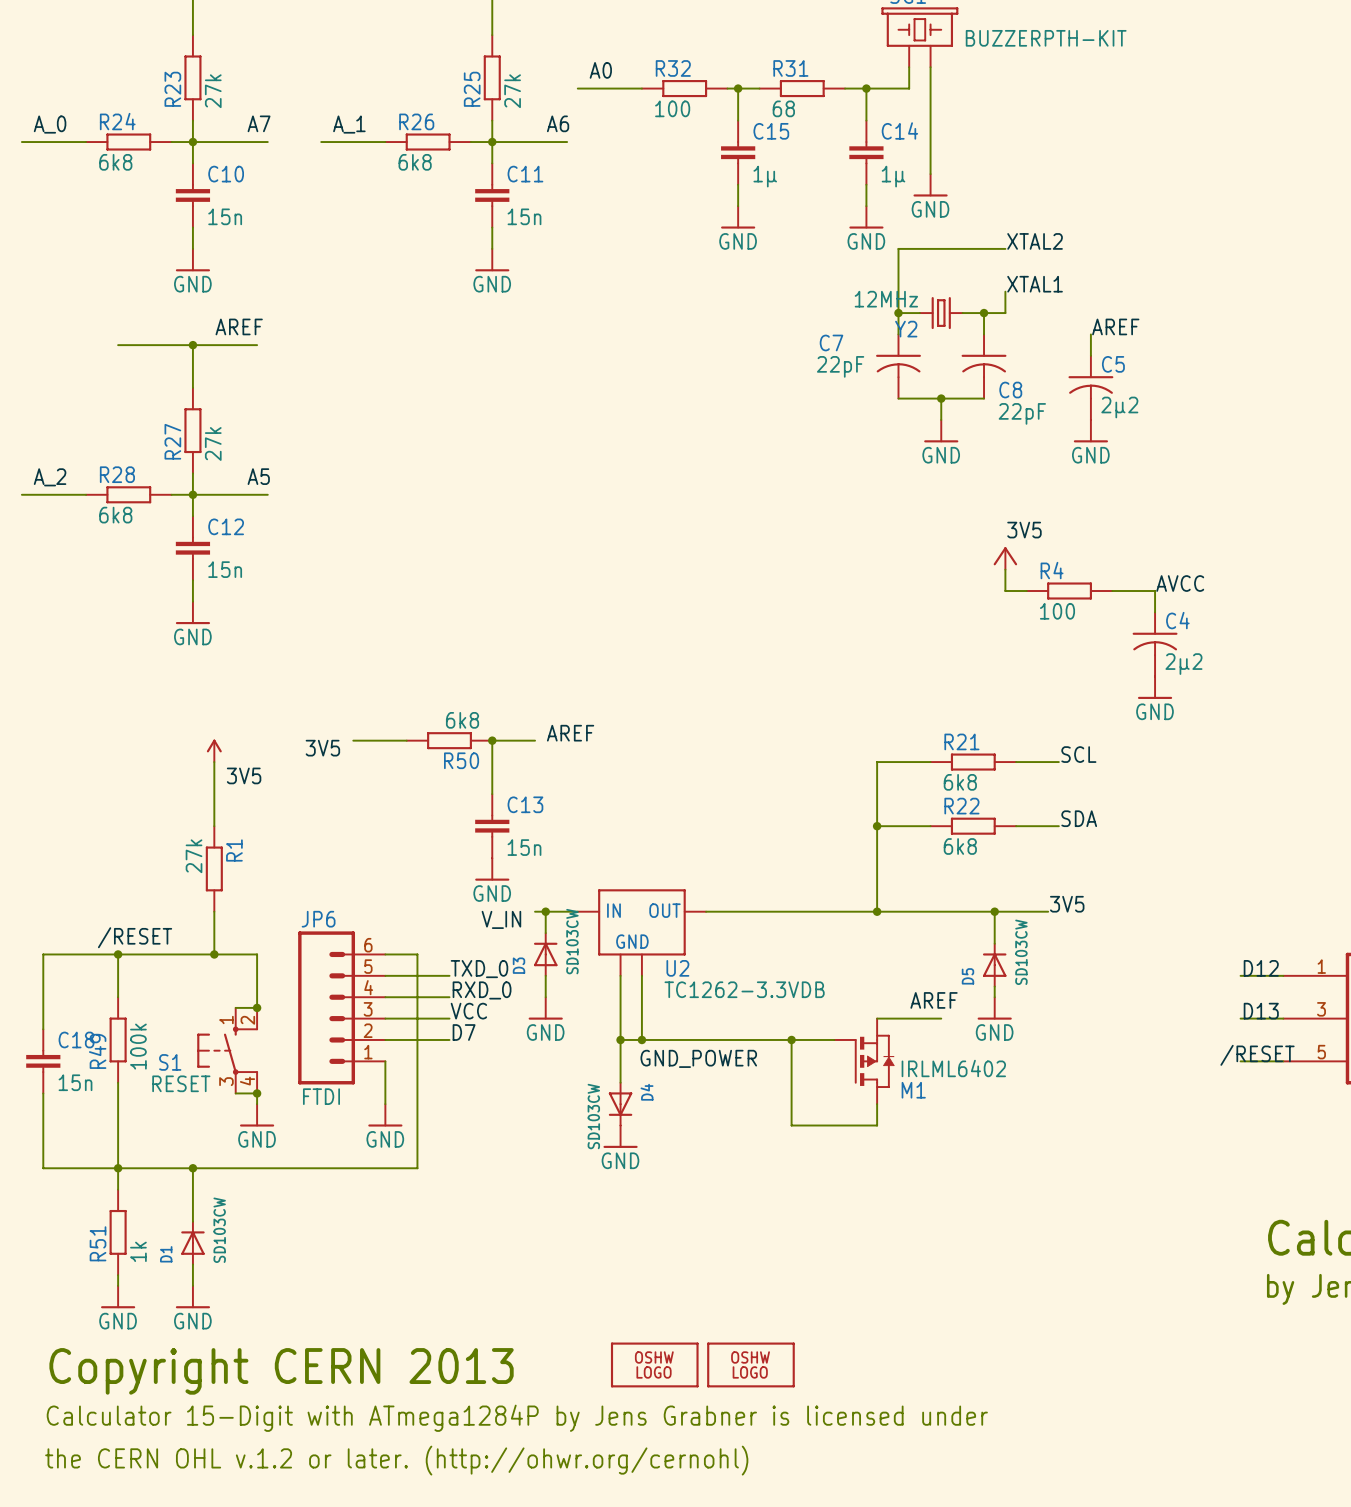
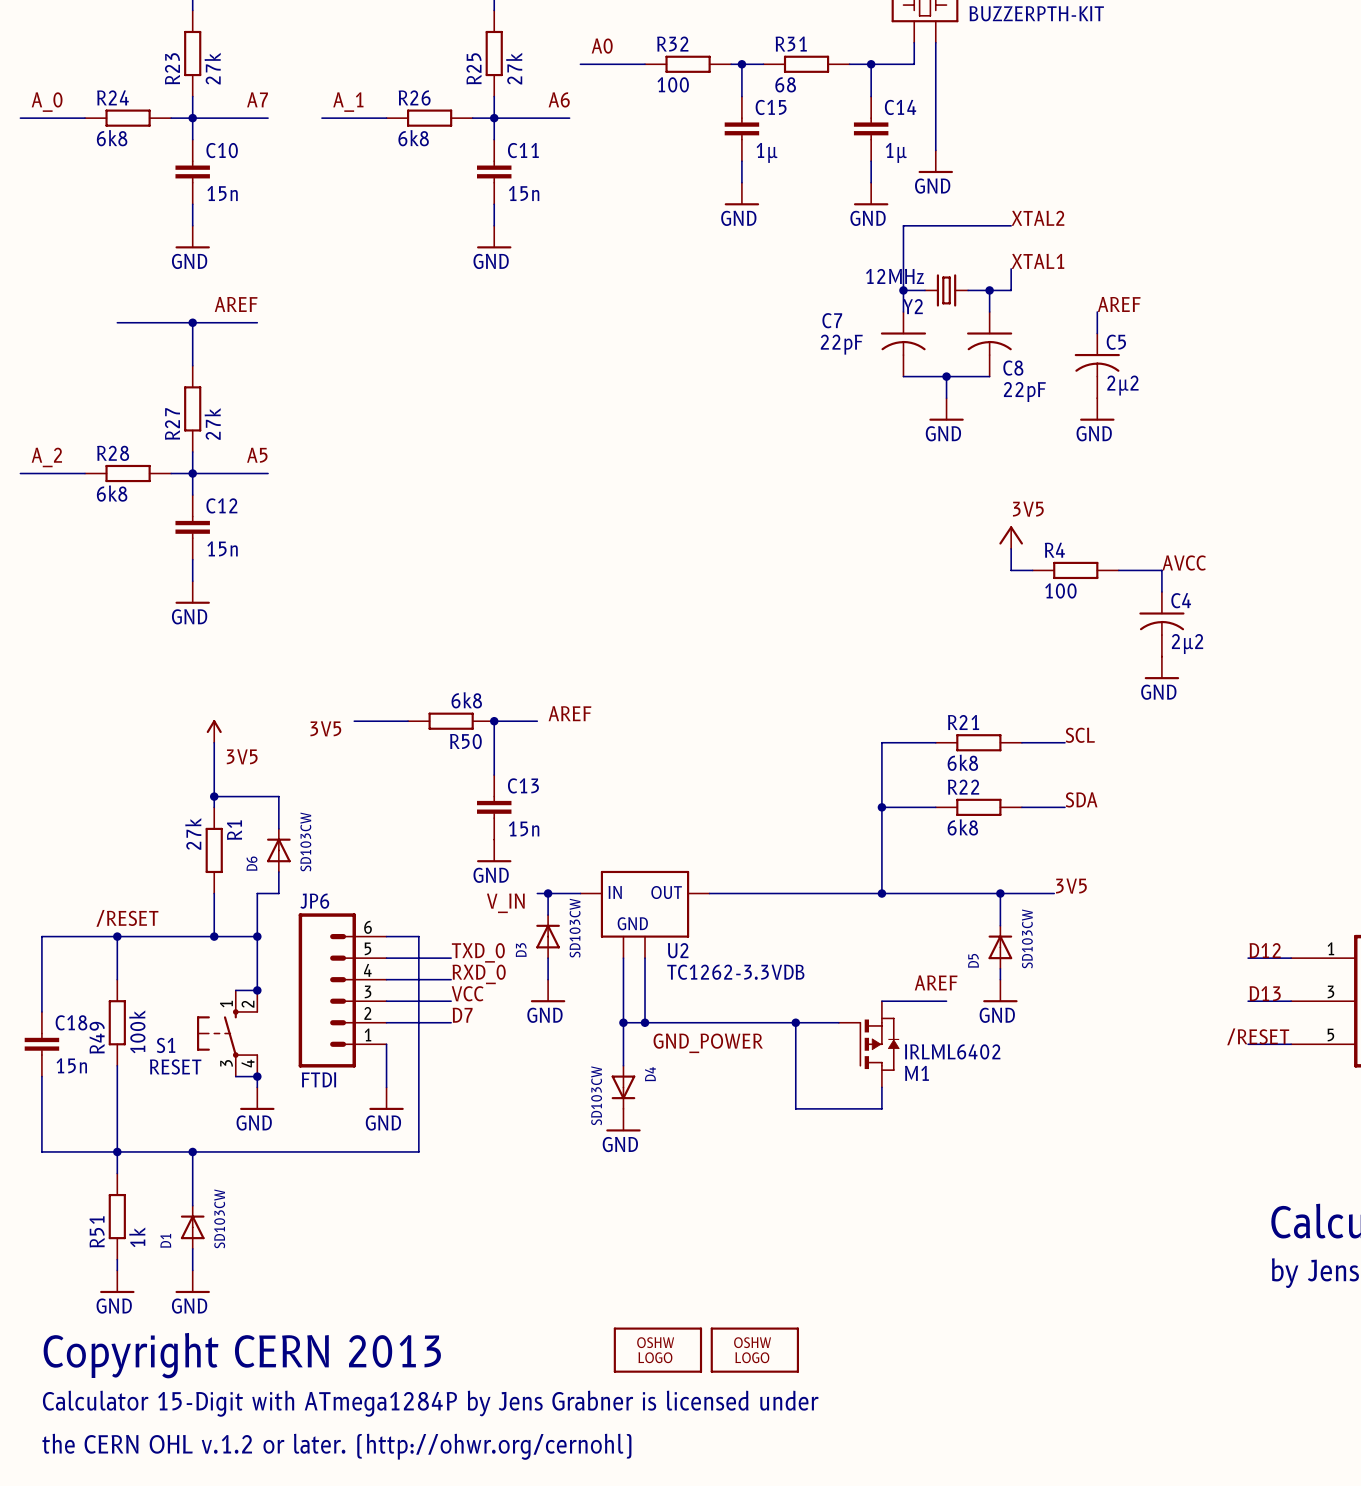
wire: none -> (214, 796) (278, 796) (278, 828)
junction: none -> (214, 796)
D6: none -> SD103CW (278, 850)
wire: none -> (278, 871) (278, 893) (257, 893) (257, 936)
junction: none -> (257, 936)

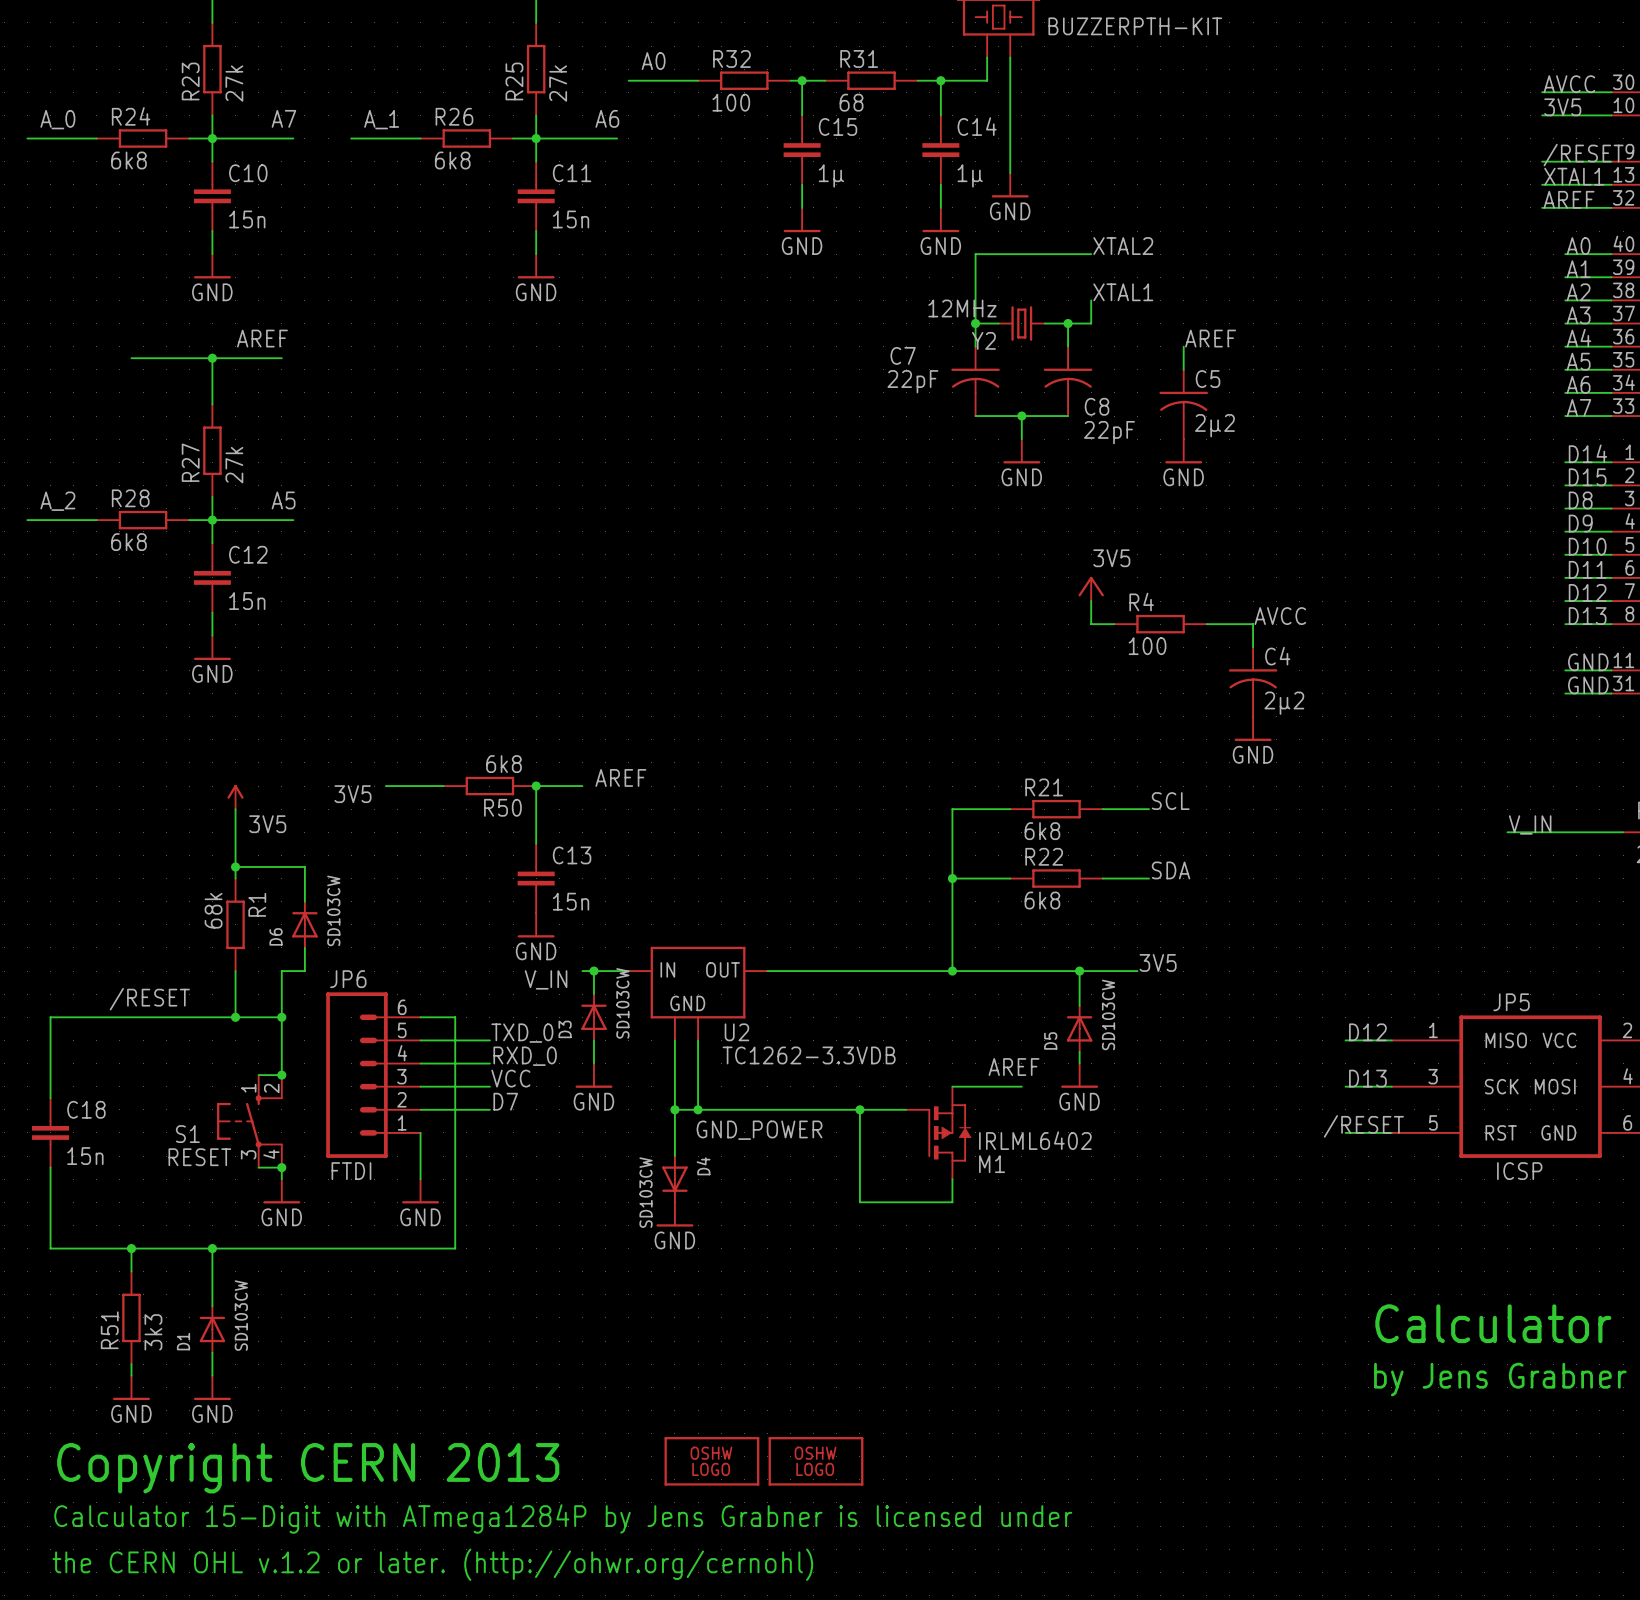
R1 value: 27k (193, 833) -> 68k (213, 910)
wire: (117, 936) (117, 979) -> none
junction: (117, 936) -> none
R49: 100k (117, 1022) -> none
wire: (117, 1065) (117, 1151) -> none
R51 value: 1k (137, 1237) -> 3k3 (153, 1332)

